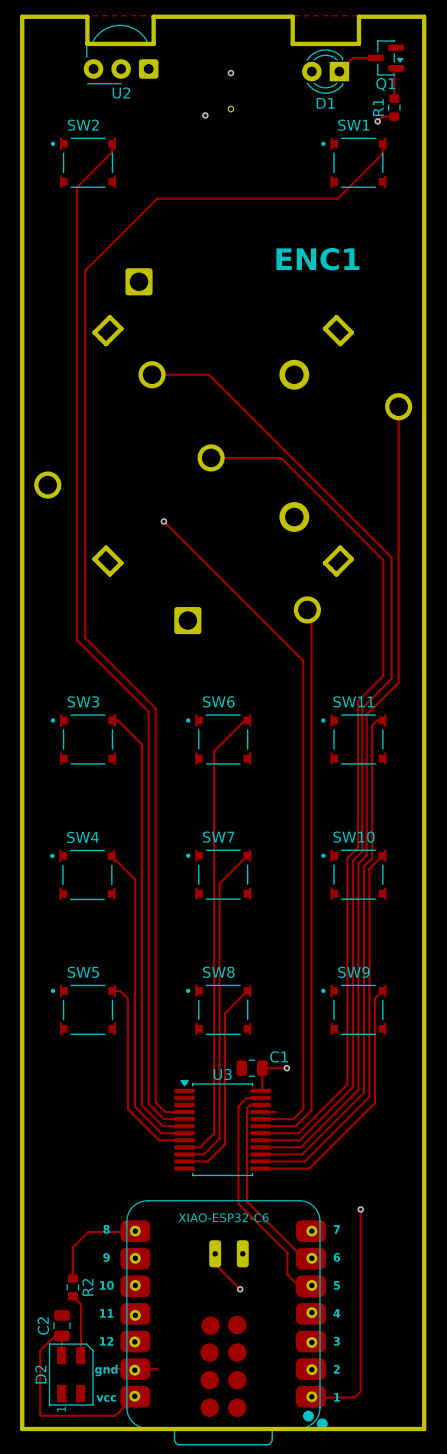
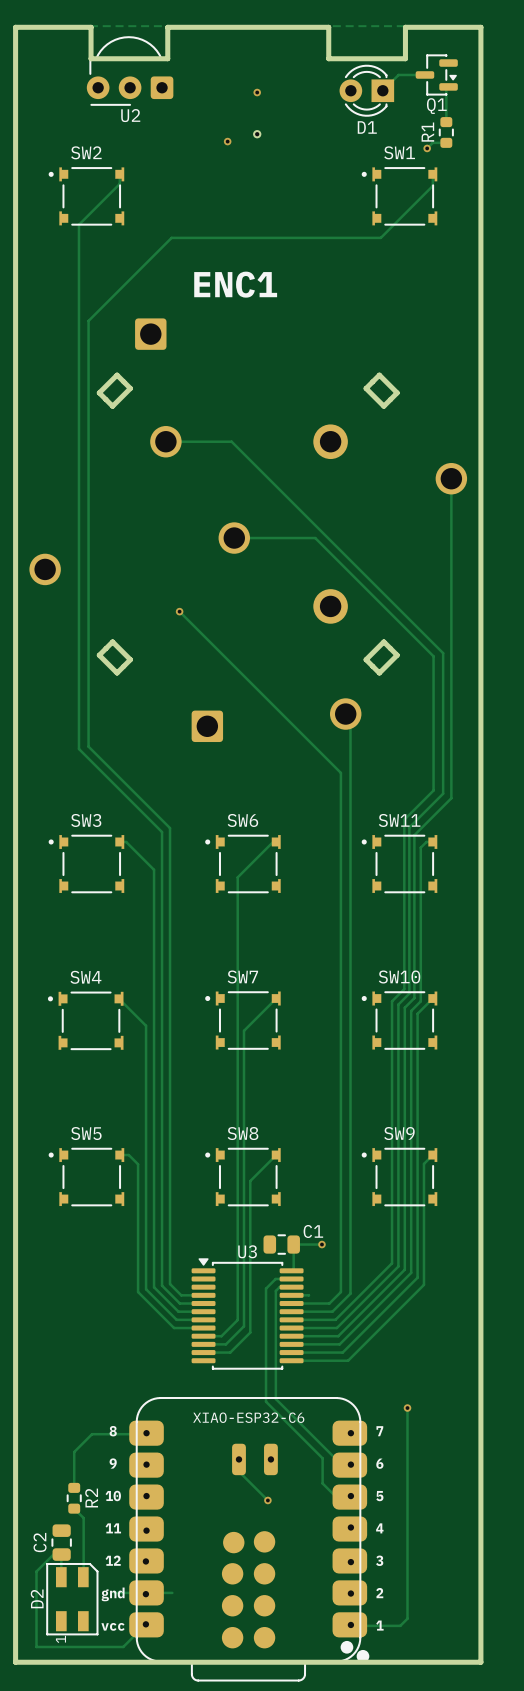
ENC1 name position: ENC1 (317, 259) -> ENC1 (235, 284)

